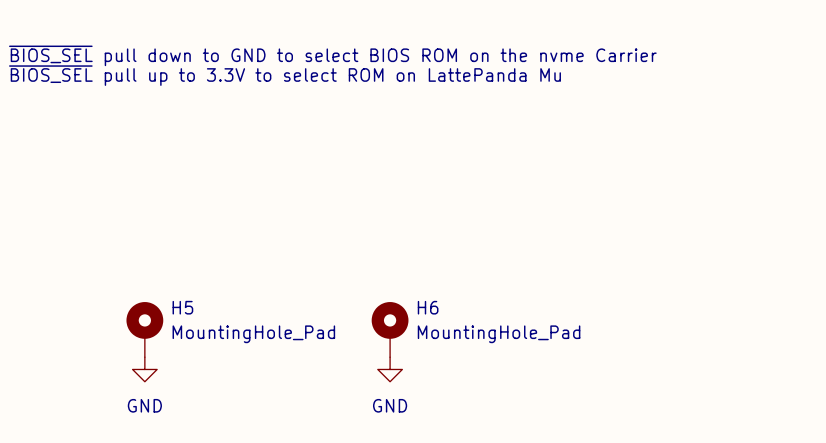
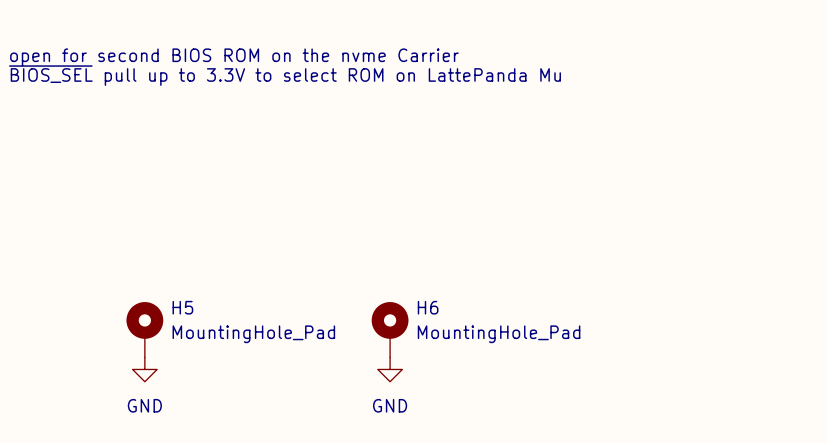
text: ~{BIOS_SEL} pull down to GND to select BIOS ROM on the nvme Carrier (332, 55) -> open for second BIOS ROM on the nvme Carrier (234, 57)

